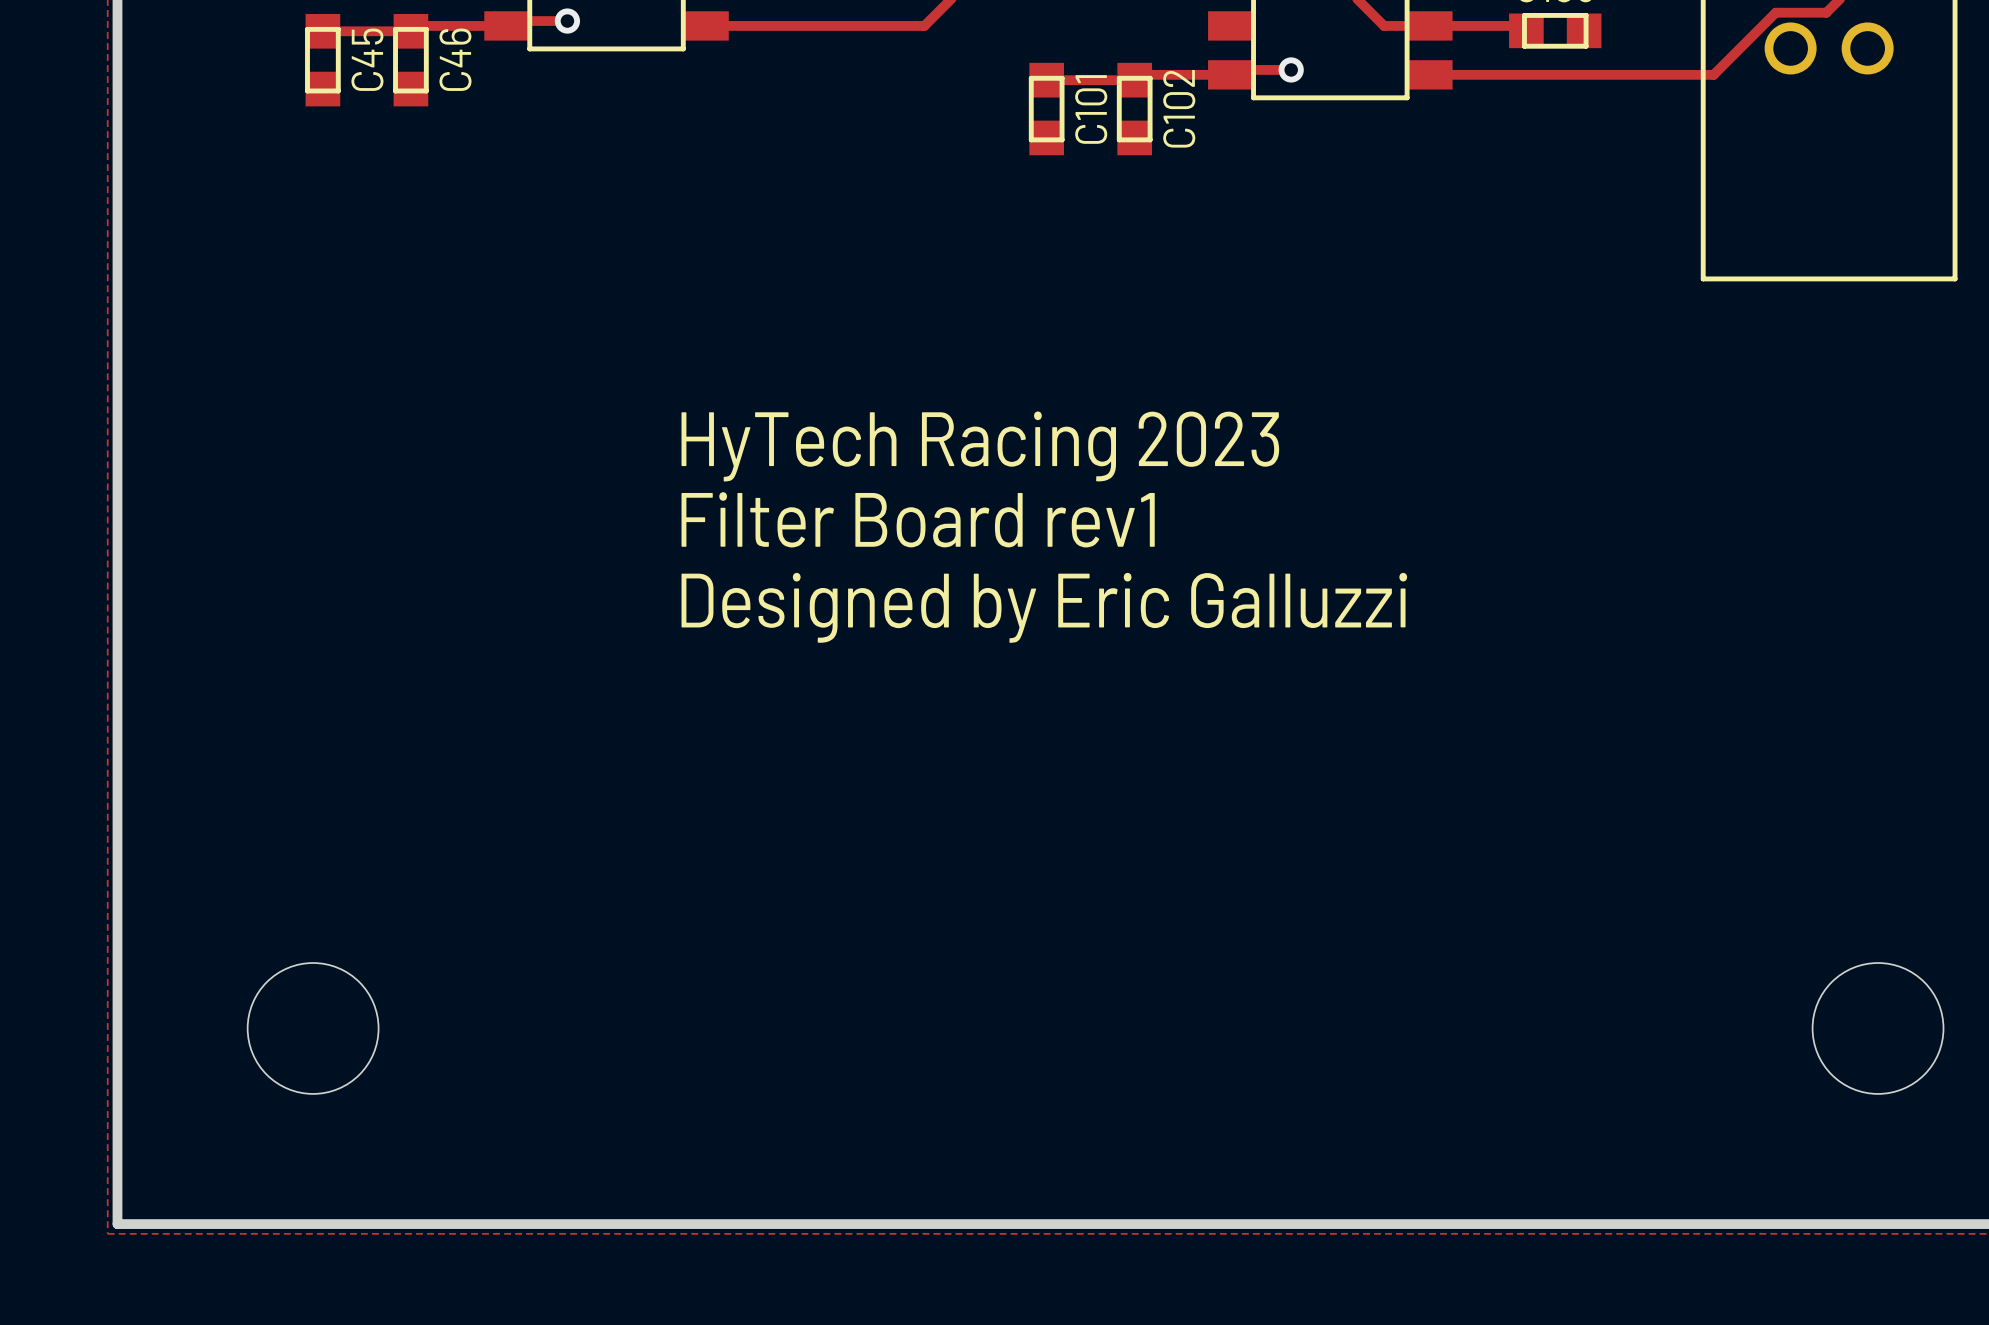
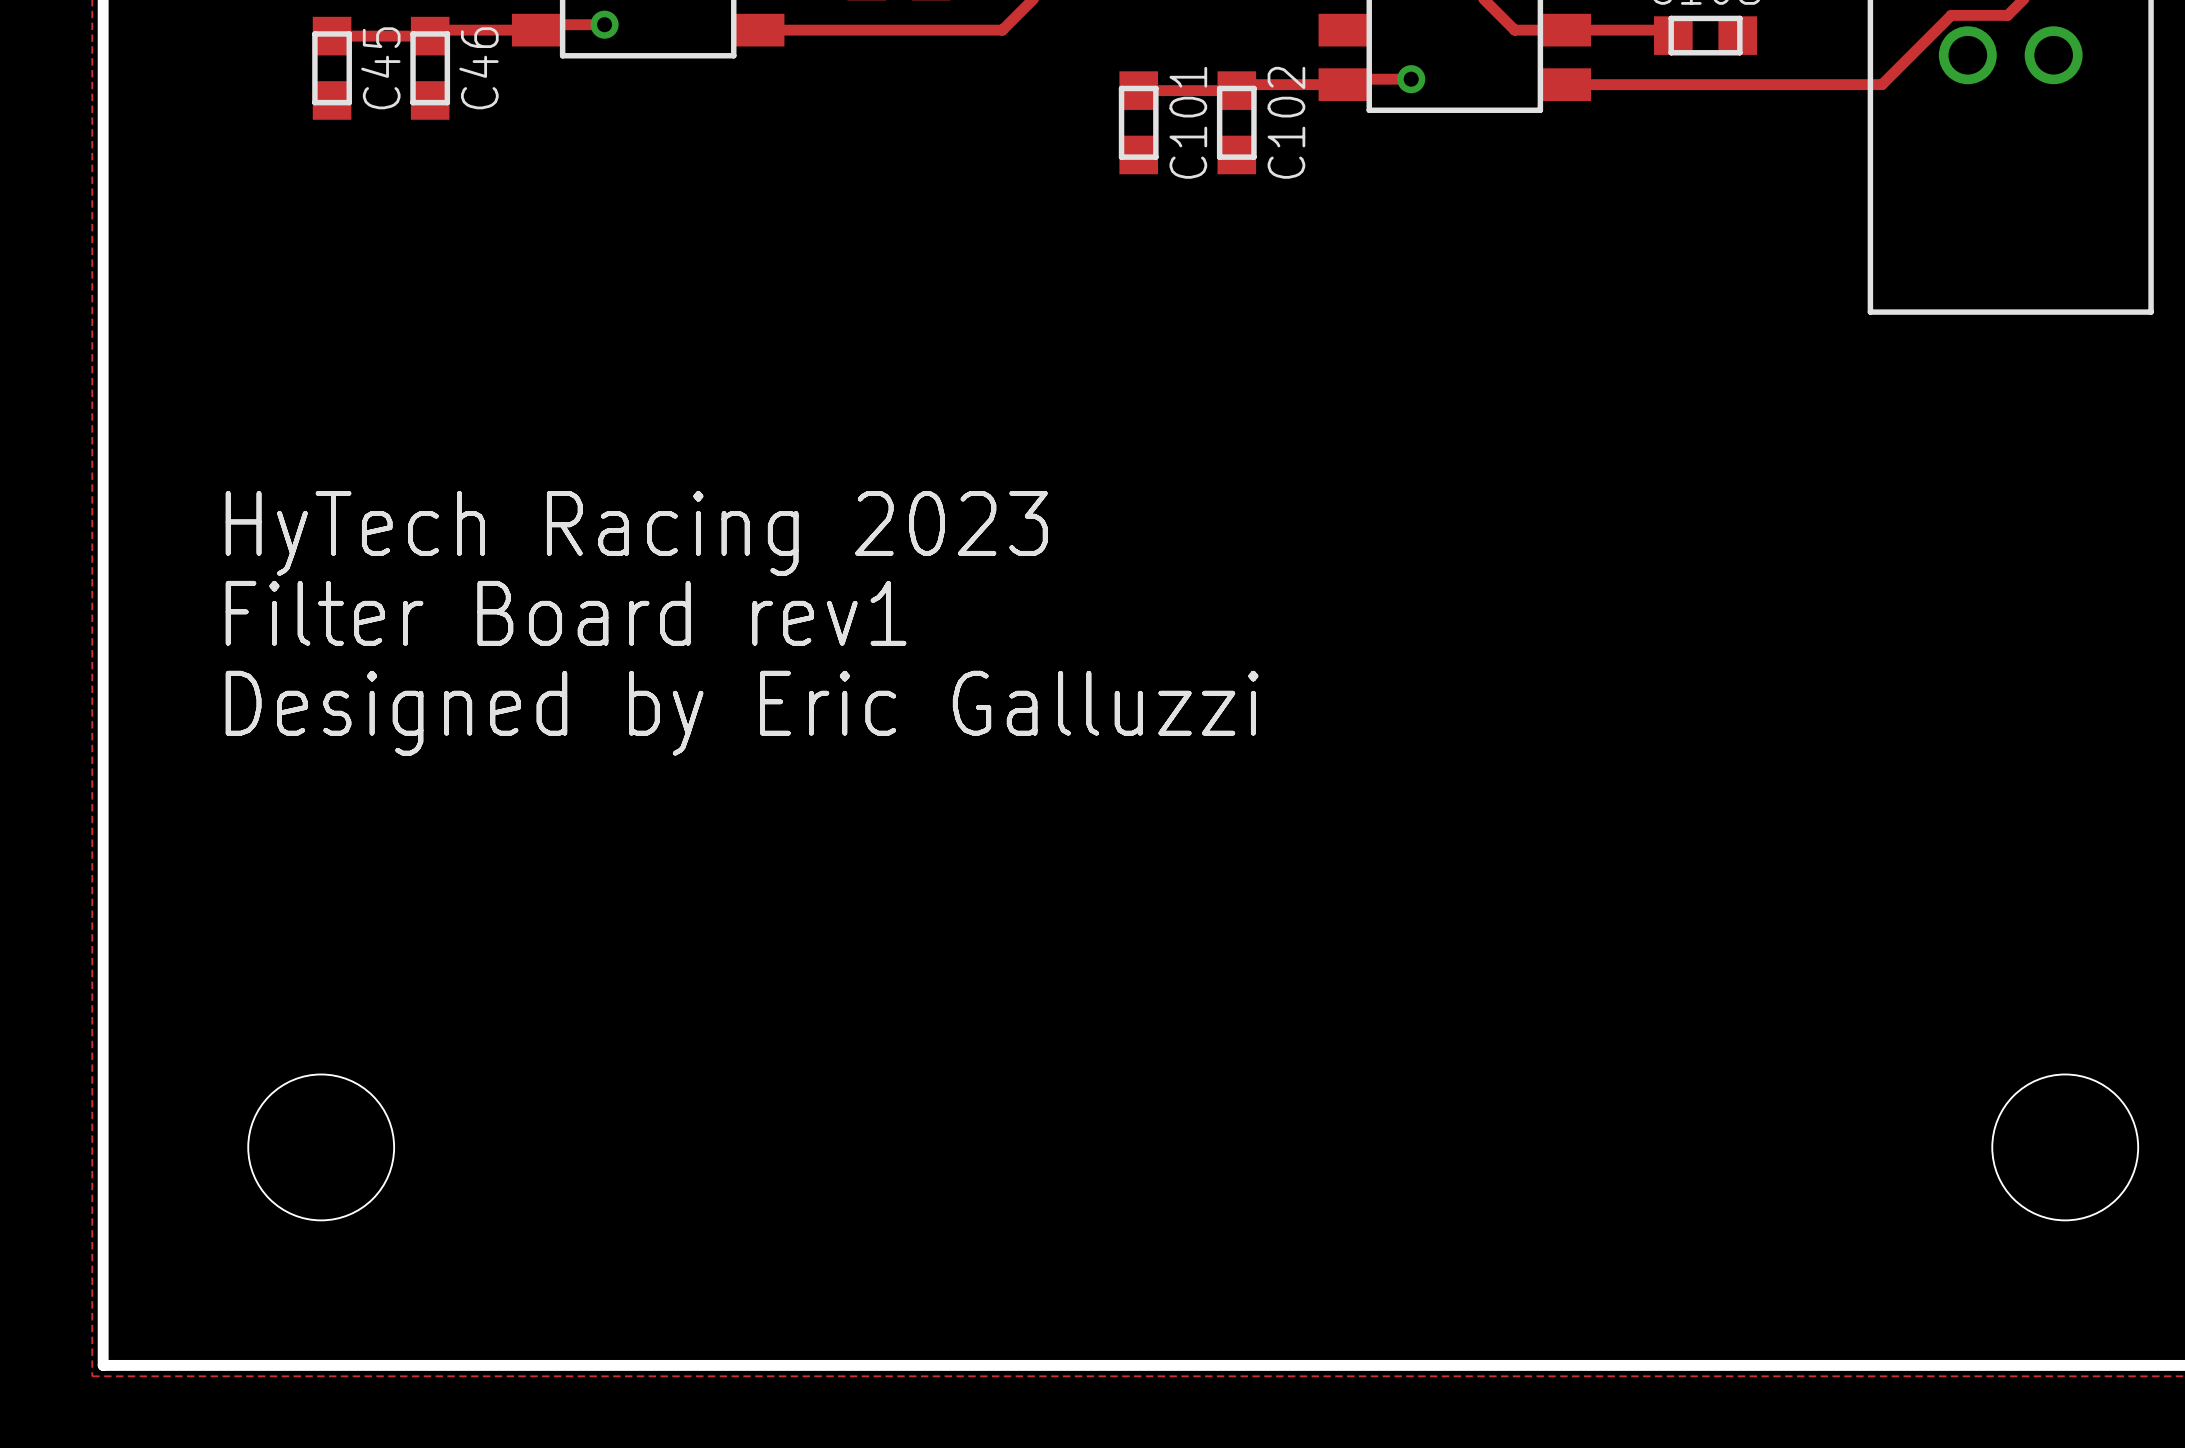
text position: HyTech Racing 2023 (980, 446) -> HyTech Racing 2023 (636, 533)
text position: Filter Board rev1 (918, 519) -> Filter Board rev1 (566, 613)
text position: Designed by Eric Galluzzi (1044, 607) -> Designed by Eric Galluzzi (742, 713)

